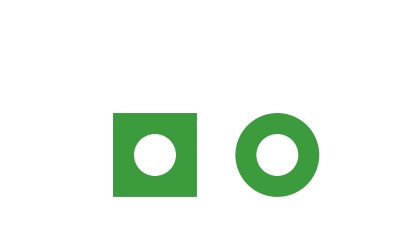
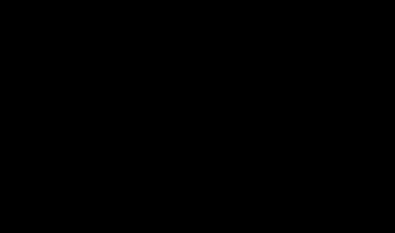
part: (216, 154) -> none

